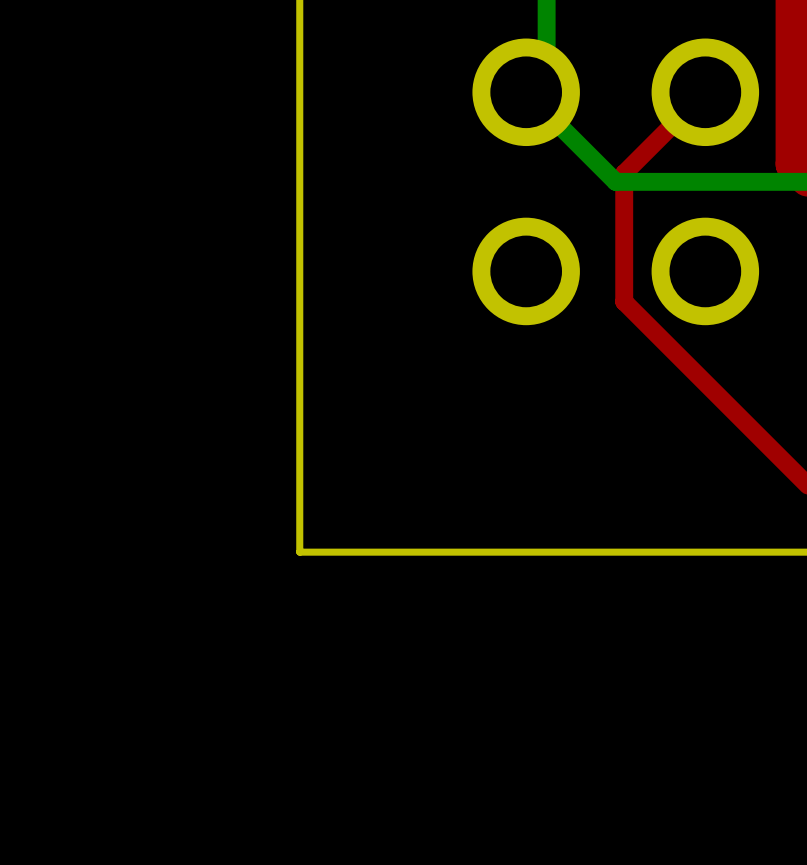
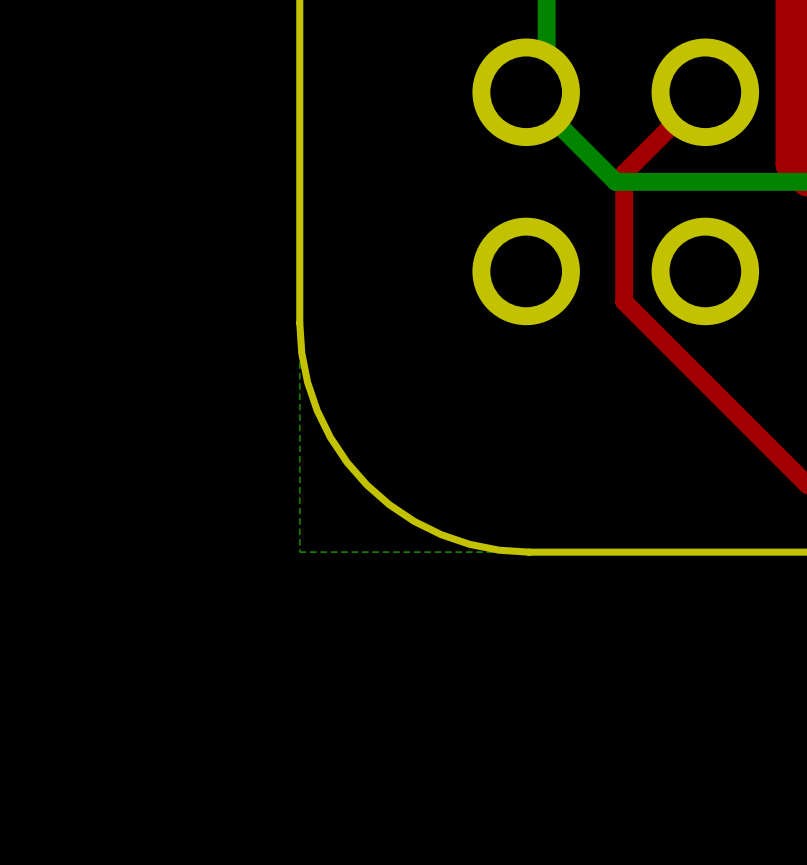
board edge: (299, 322) (299, 552) (529, 552) -> (299, 322) (301, 352) (307, 382) (317, 410) (330, 437) (347, 462) (366, 485) (389, 504) (414, 521) (441, 534) (469, 544) (499, 550) (529, 552)

